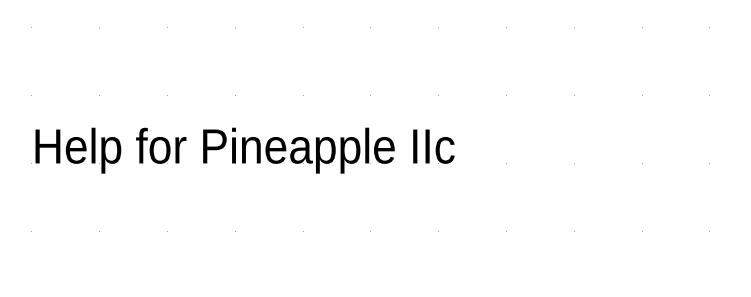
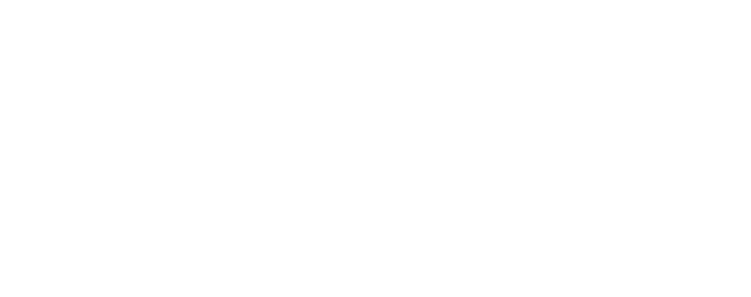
part: (245, 150) -> none

